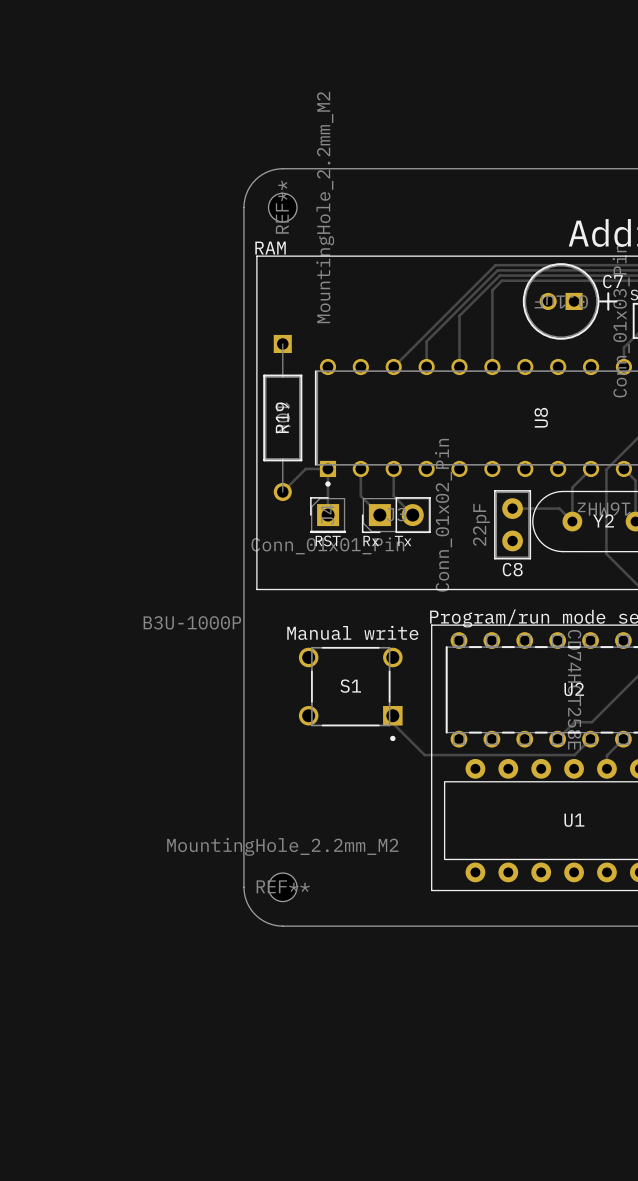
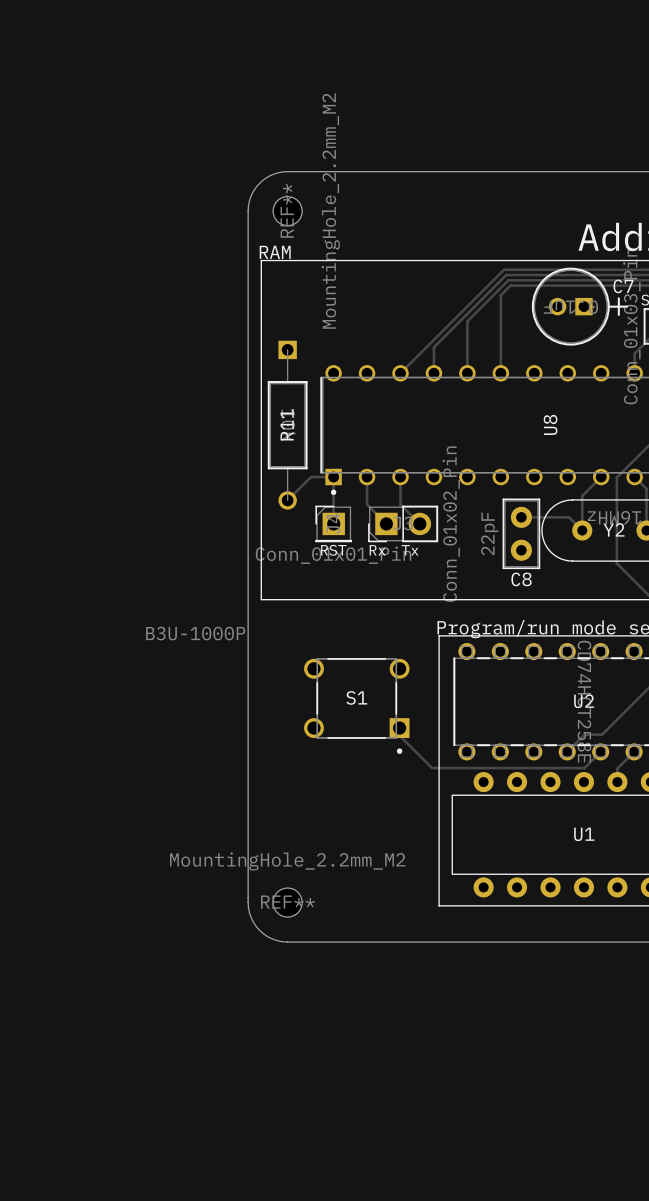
R19 name: R19 (282, 417) -> R11 (287, 424)
text: Manual write (352, 632) -> none

